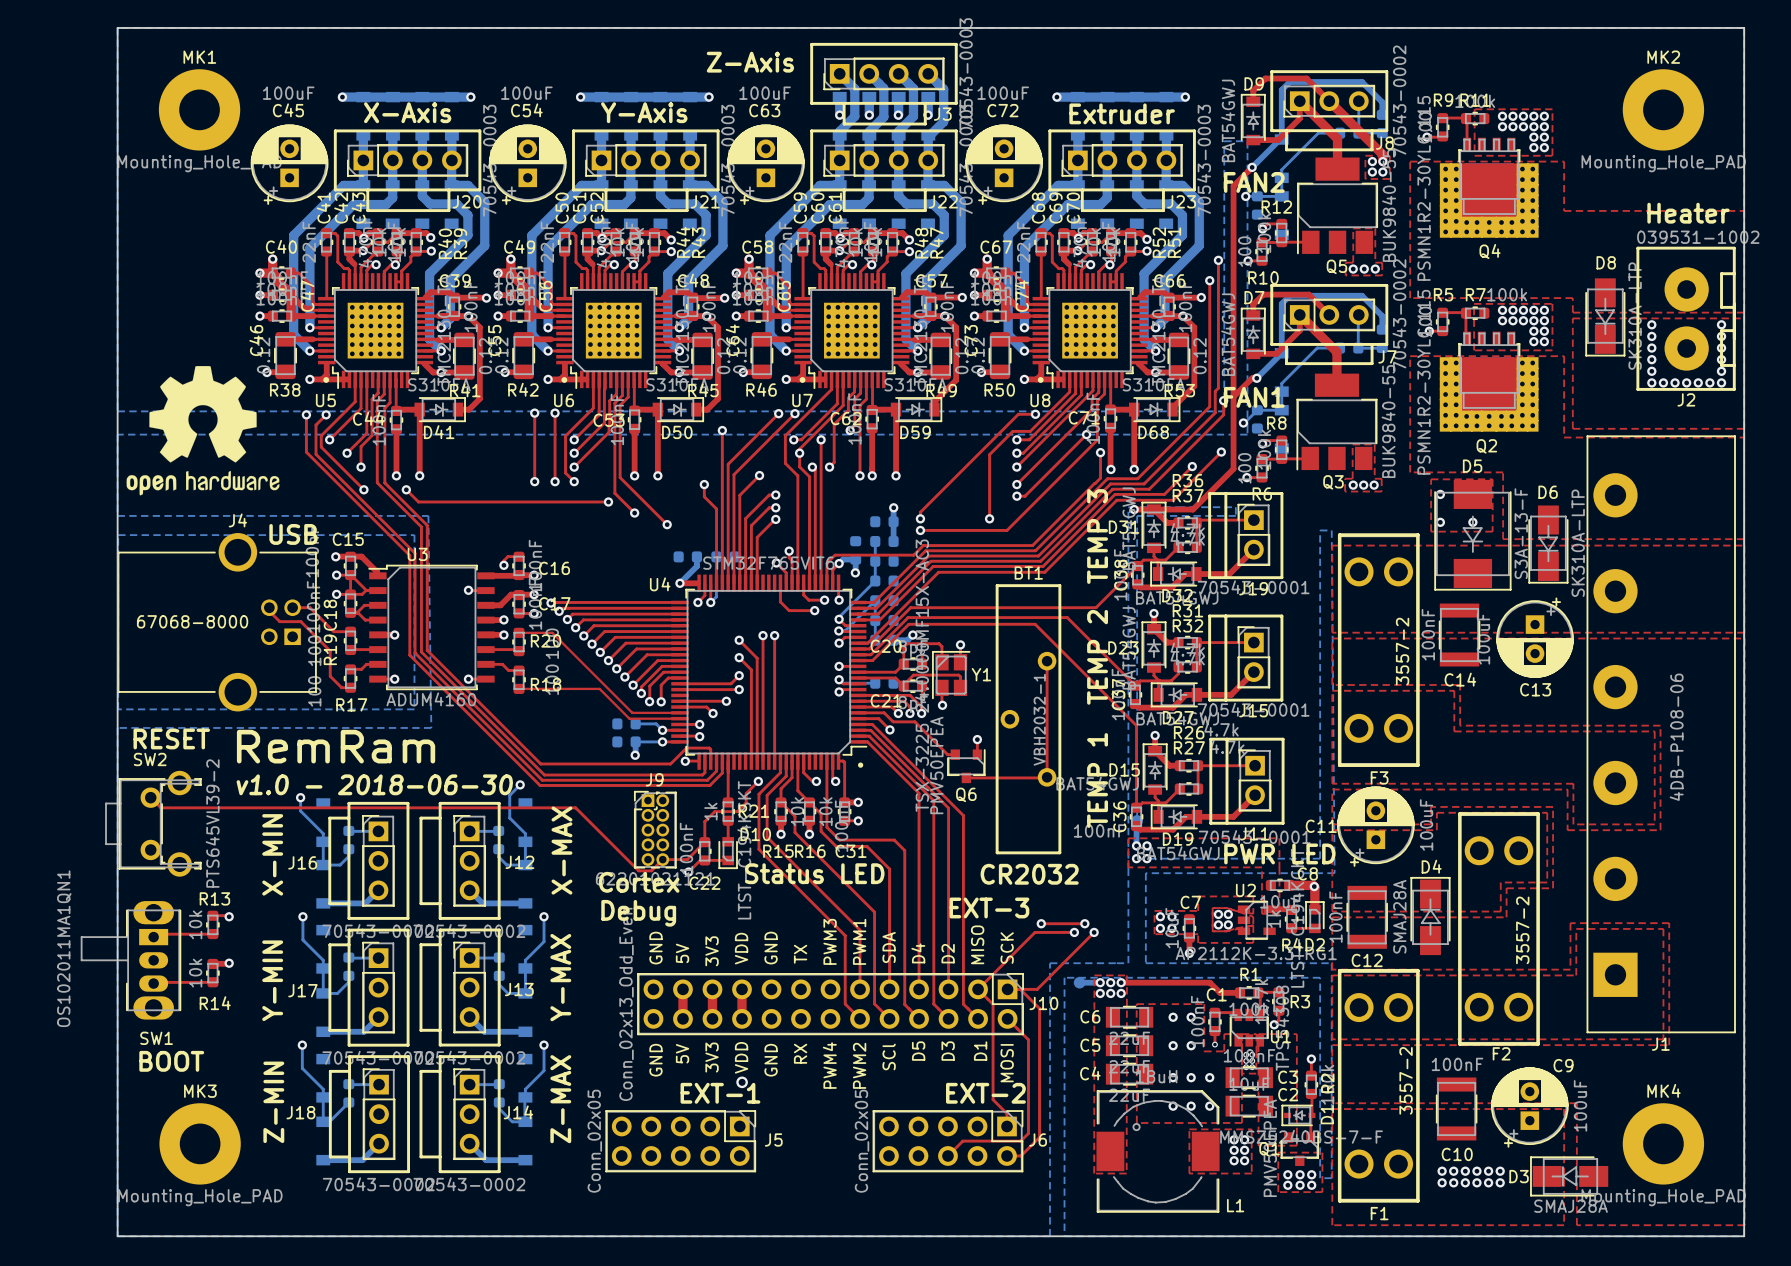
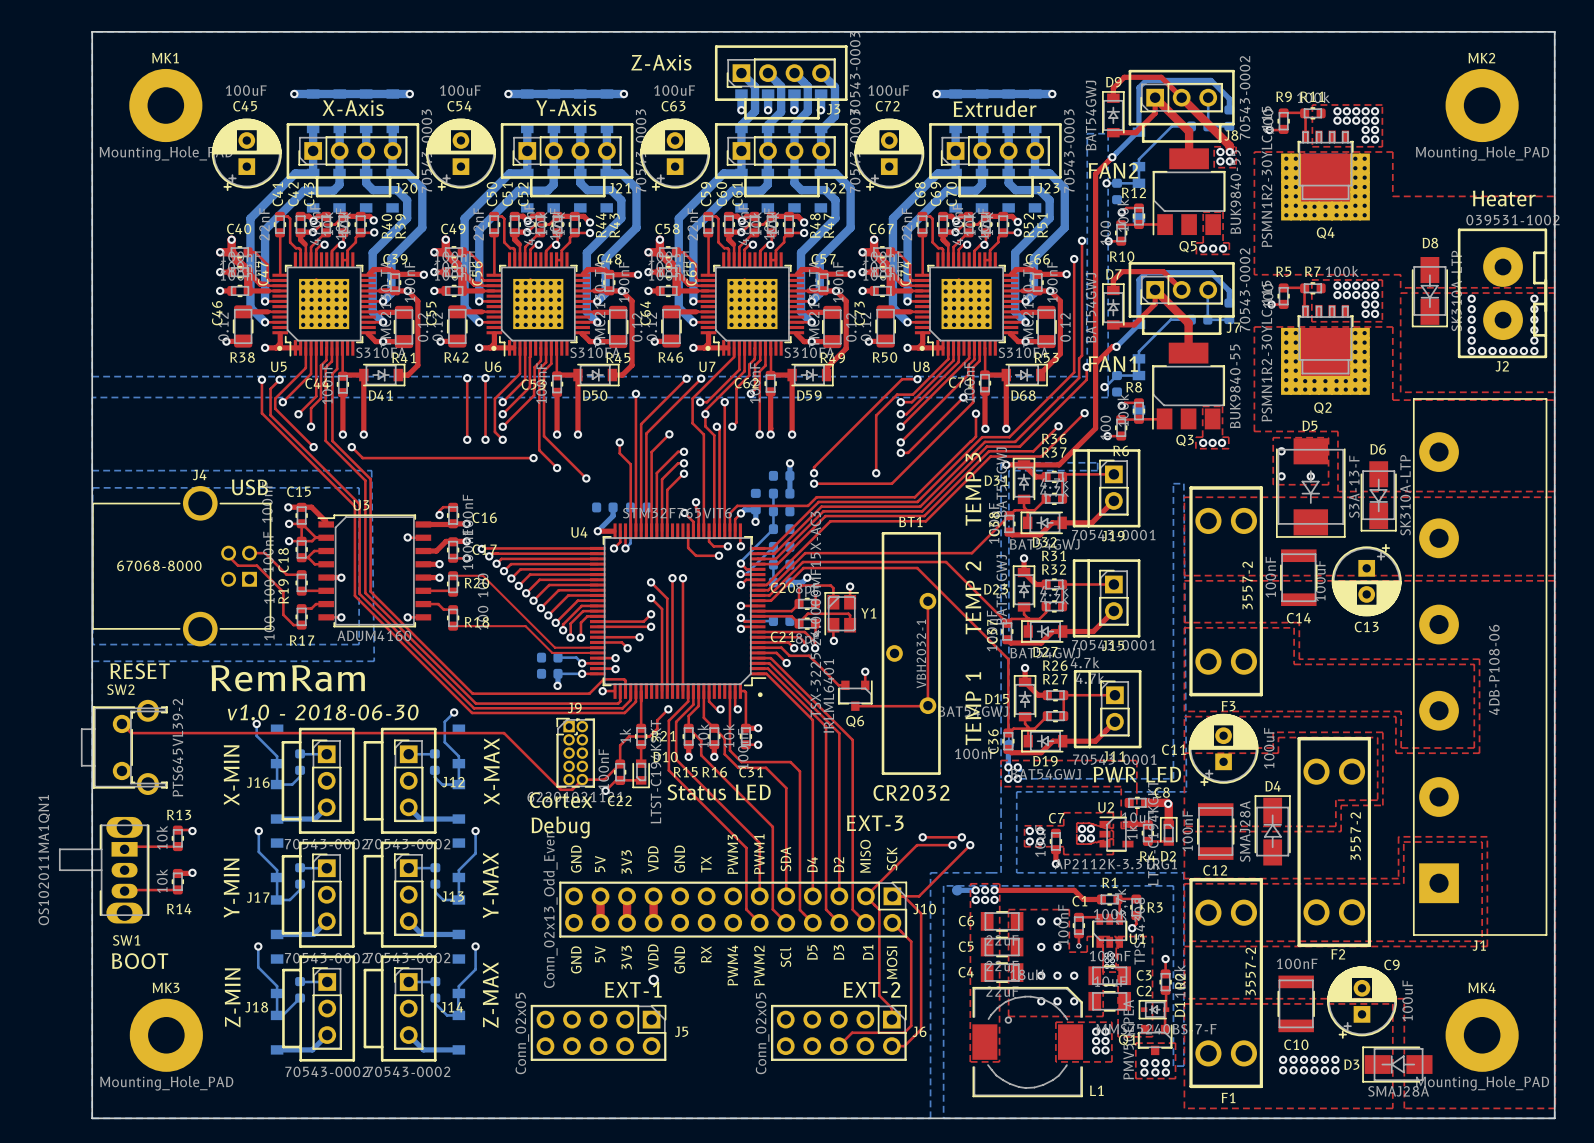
drawing: [126, 366, 280, 496] -> none
Q6 value: PMV50EPEA (936, 765) -> IRLML6401 (828, 696)

